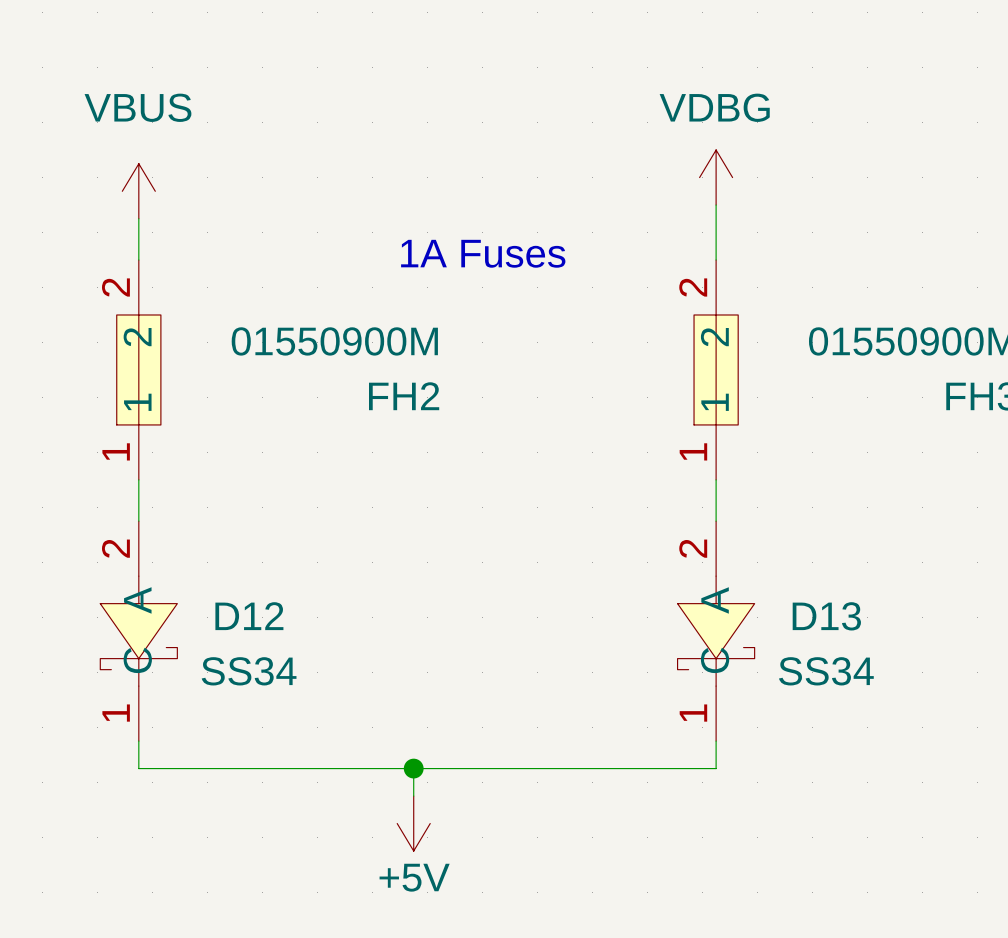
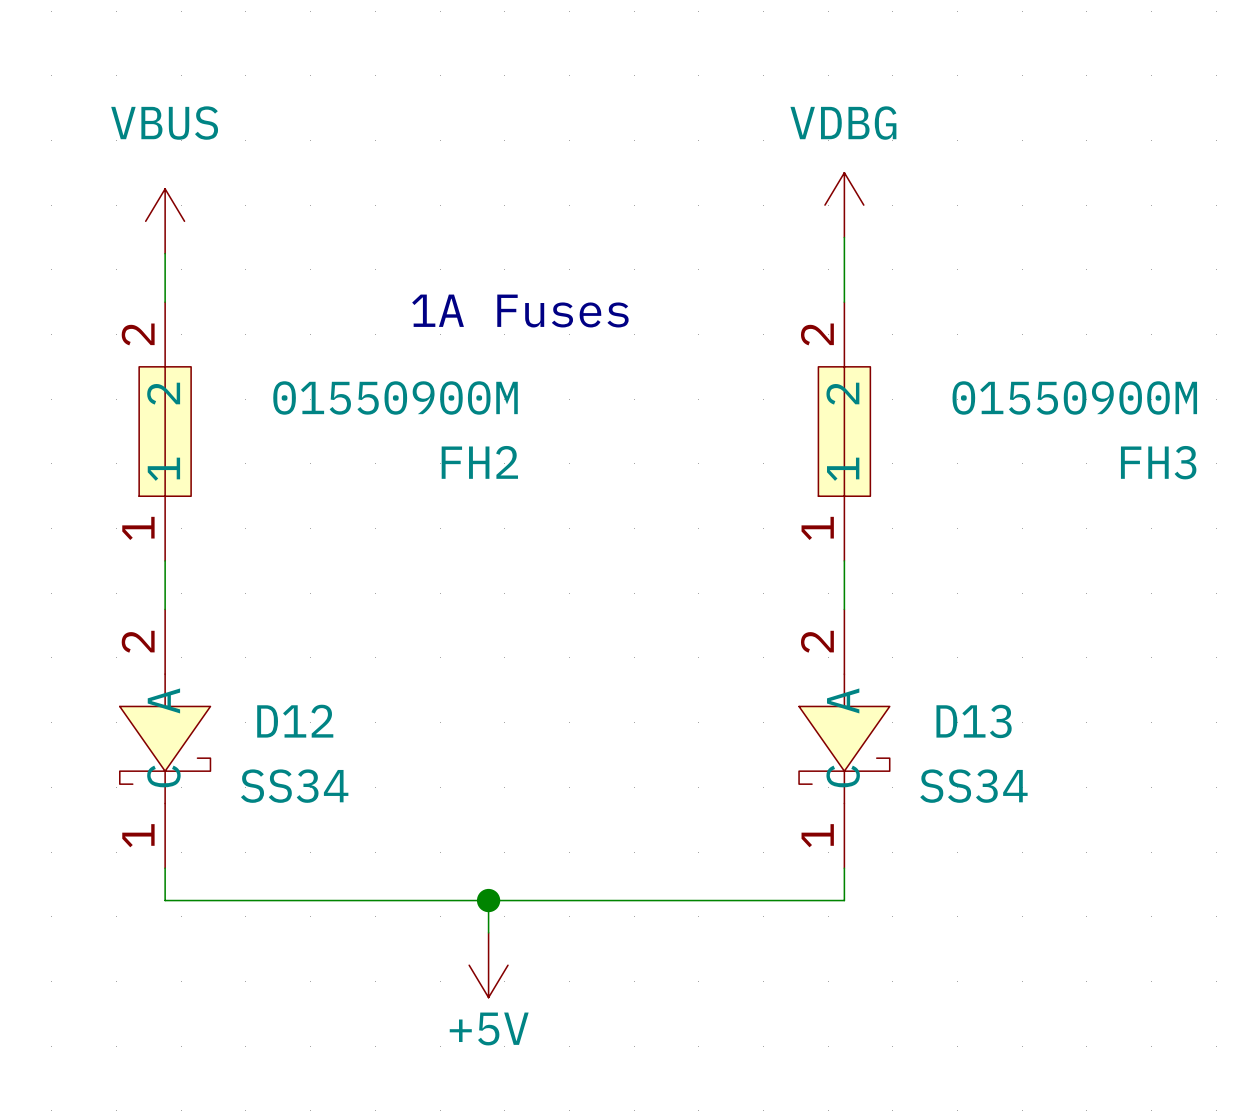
text position: 1A Fuses (483, 253) -> 1A Fuses (520, 311)

